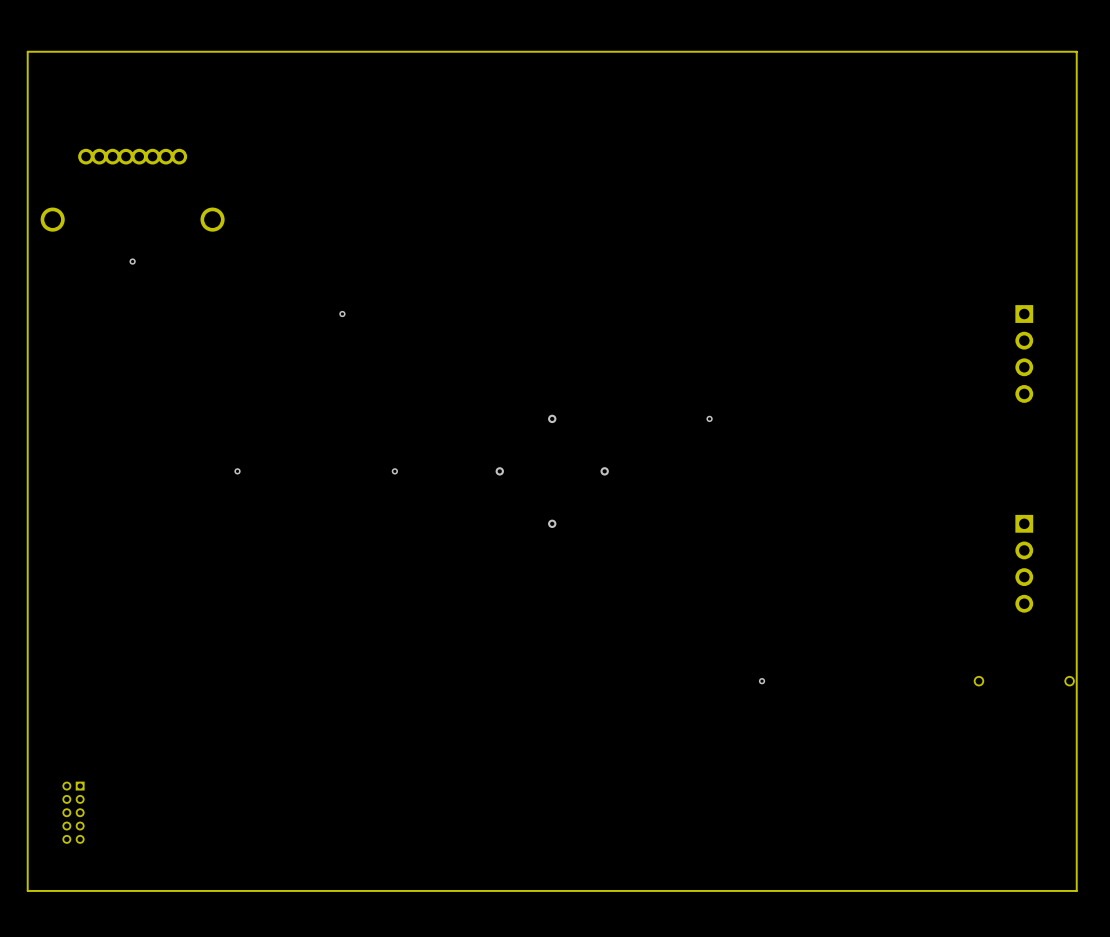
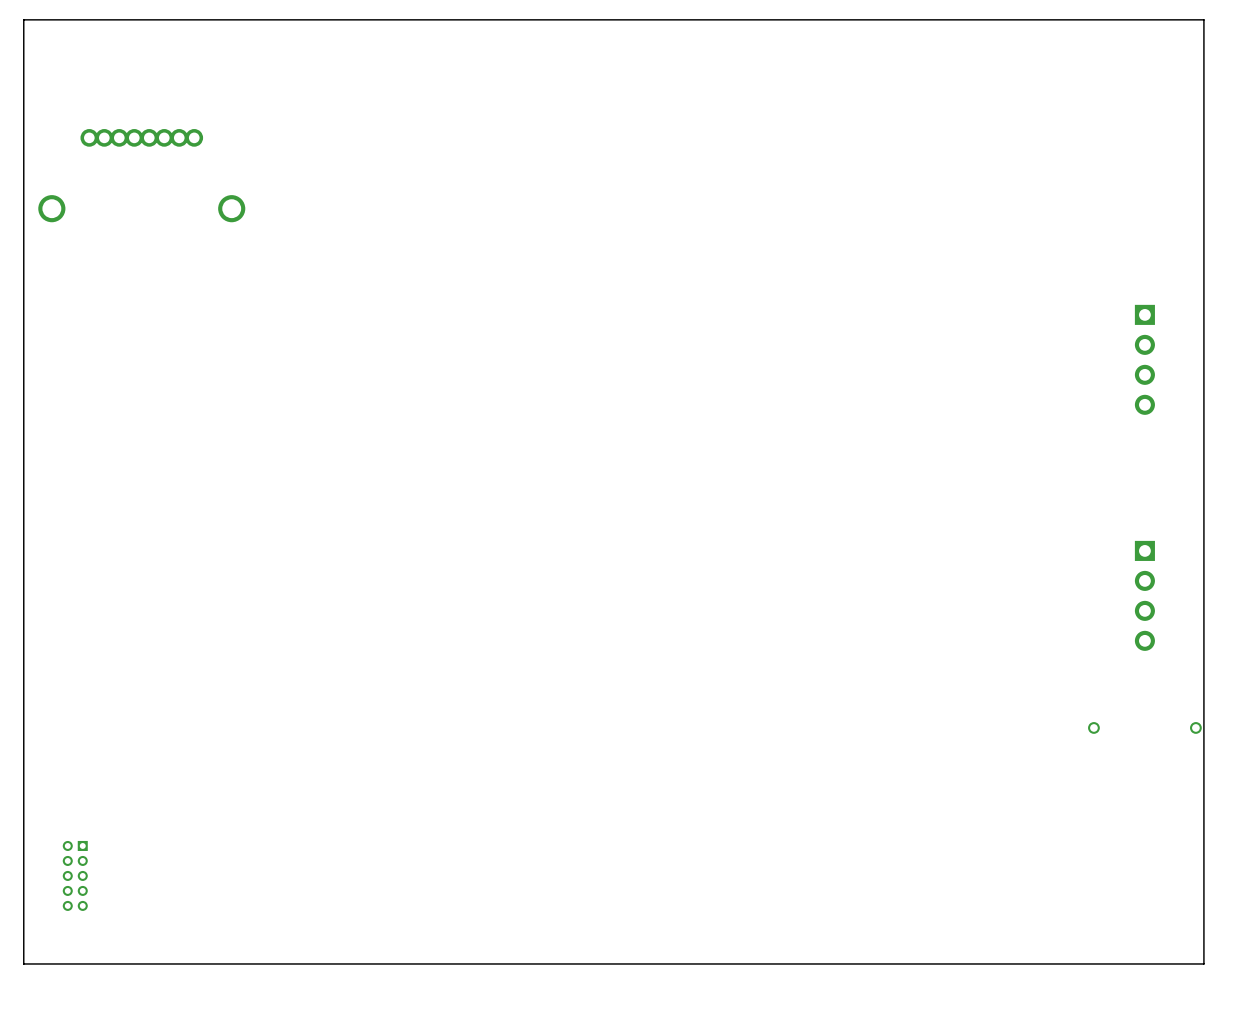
via: (132, 261) -> none
via: (342, 314) -> none
via: (552, 418) -> none
via: (709, 418) -> none
via: (237, 471) -> none
via: (394, 471) -> none
via: (499, 471) -> none
via: (604, 471) -> none
via: (552, 523) -> none
via: (762, 681) -> none

